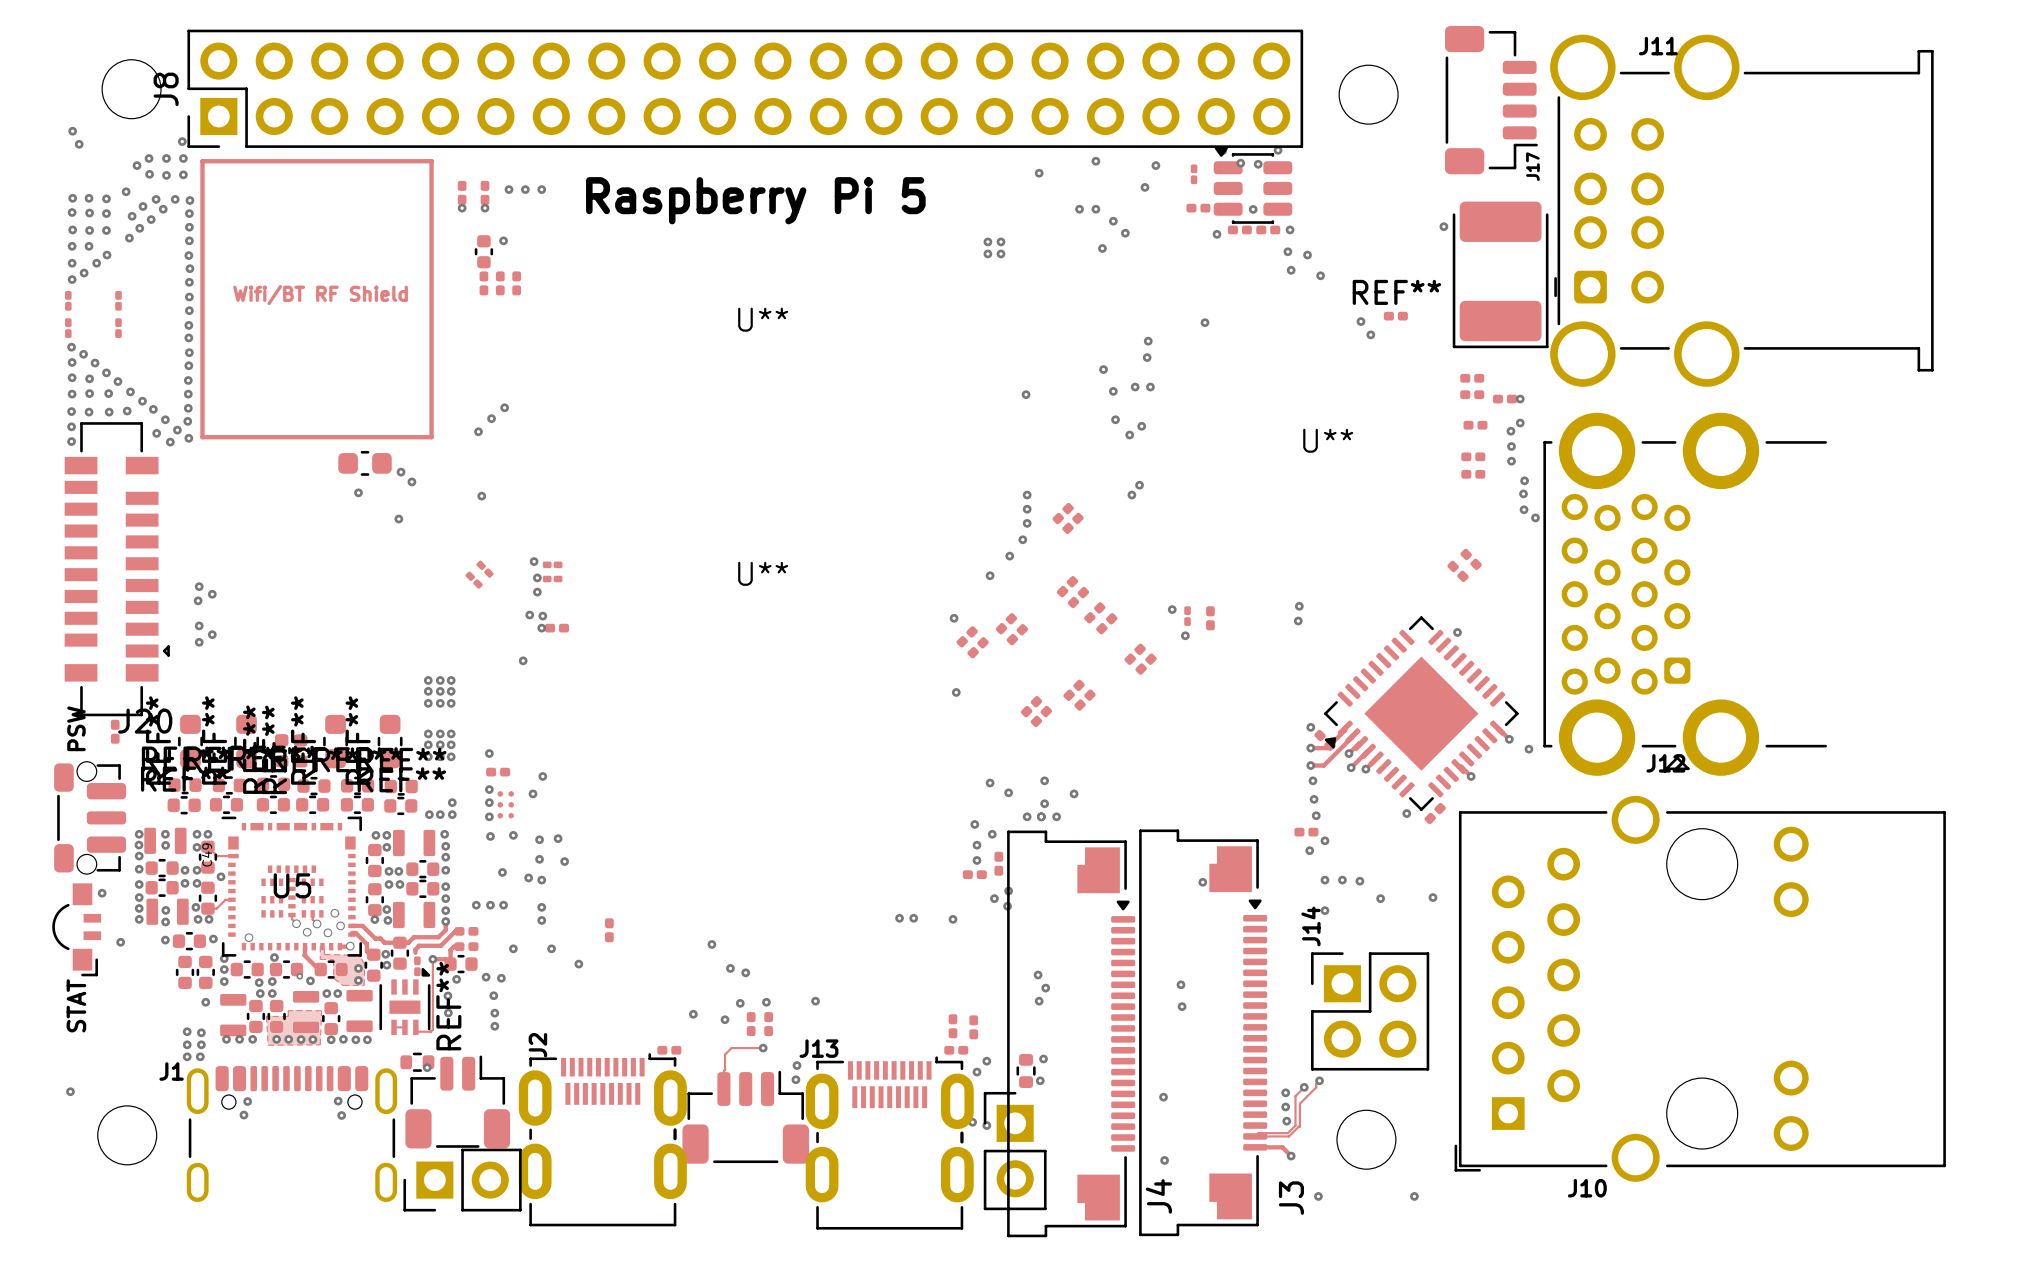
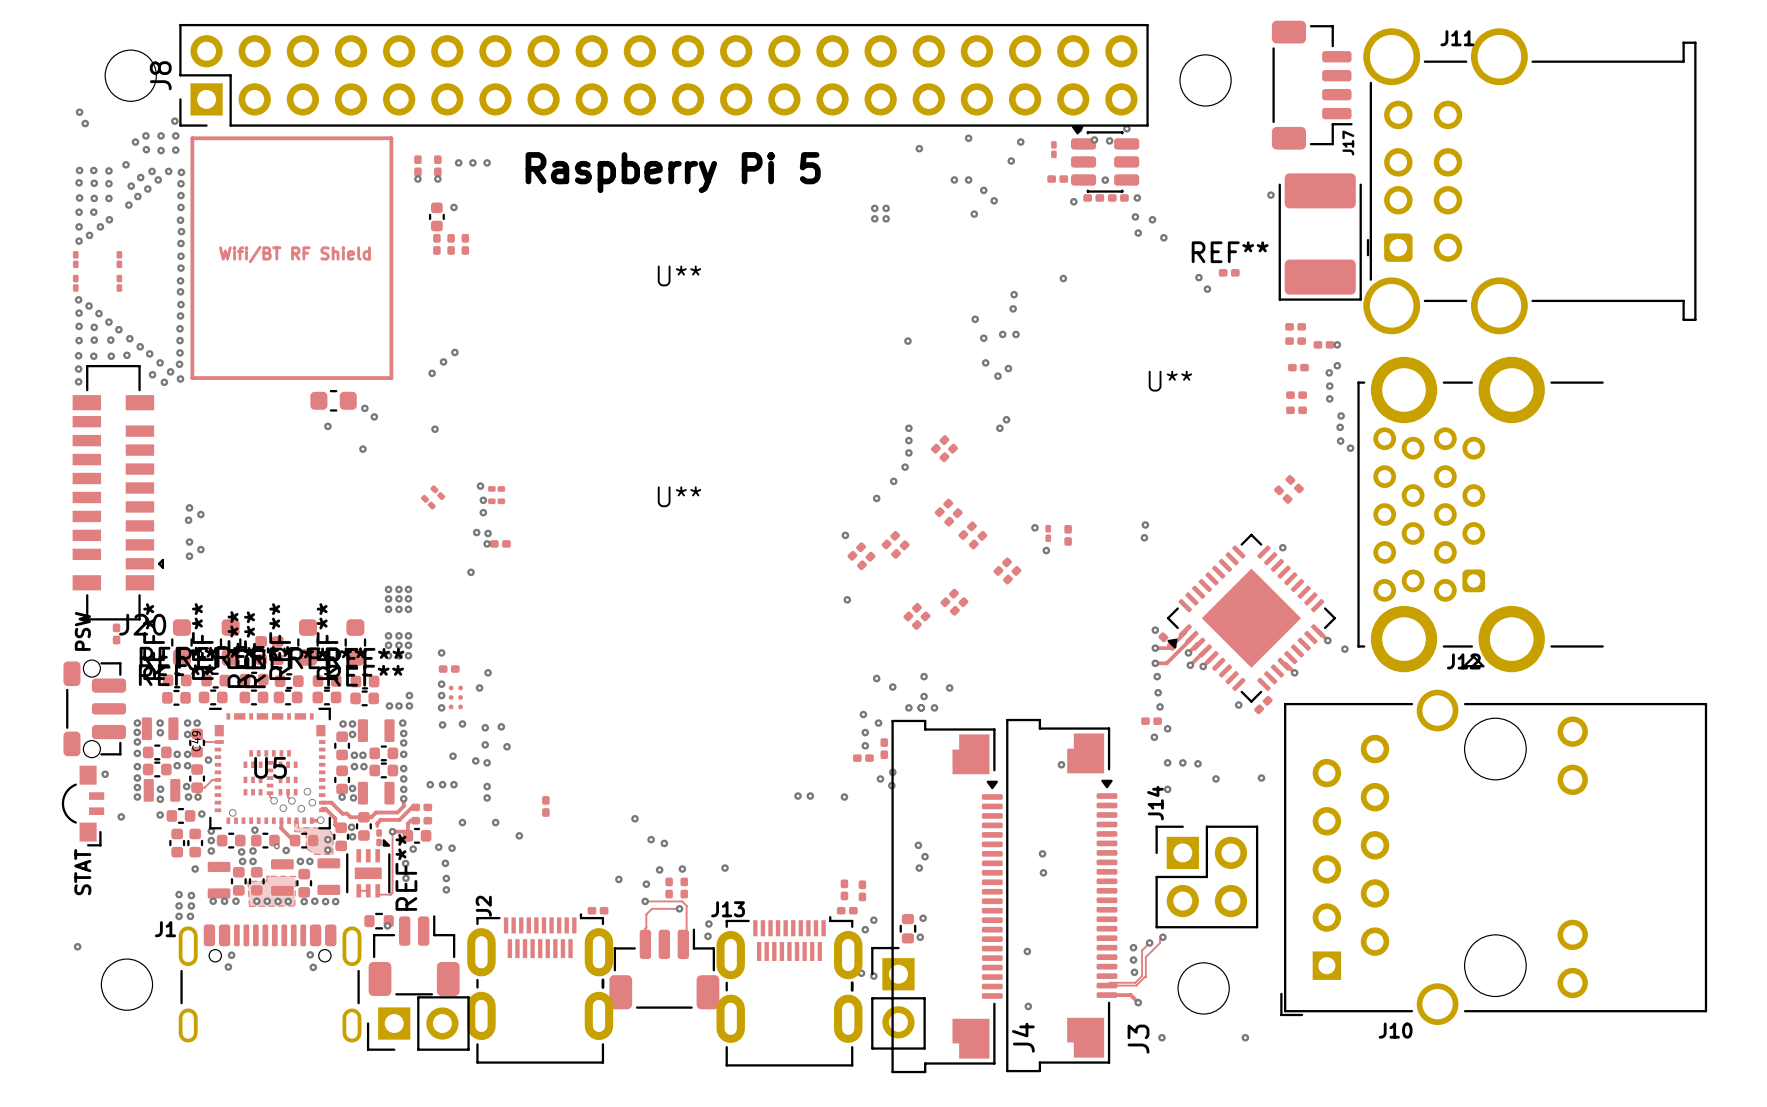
track: none -> (645, 901) (682, 901) (686, 905) (686, 941) (683, 944)
via: none -> (645, 901)

